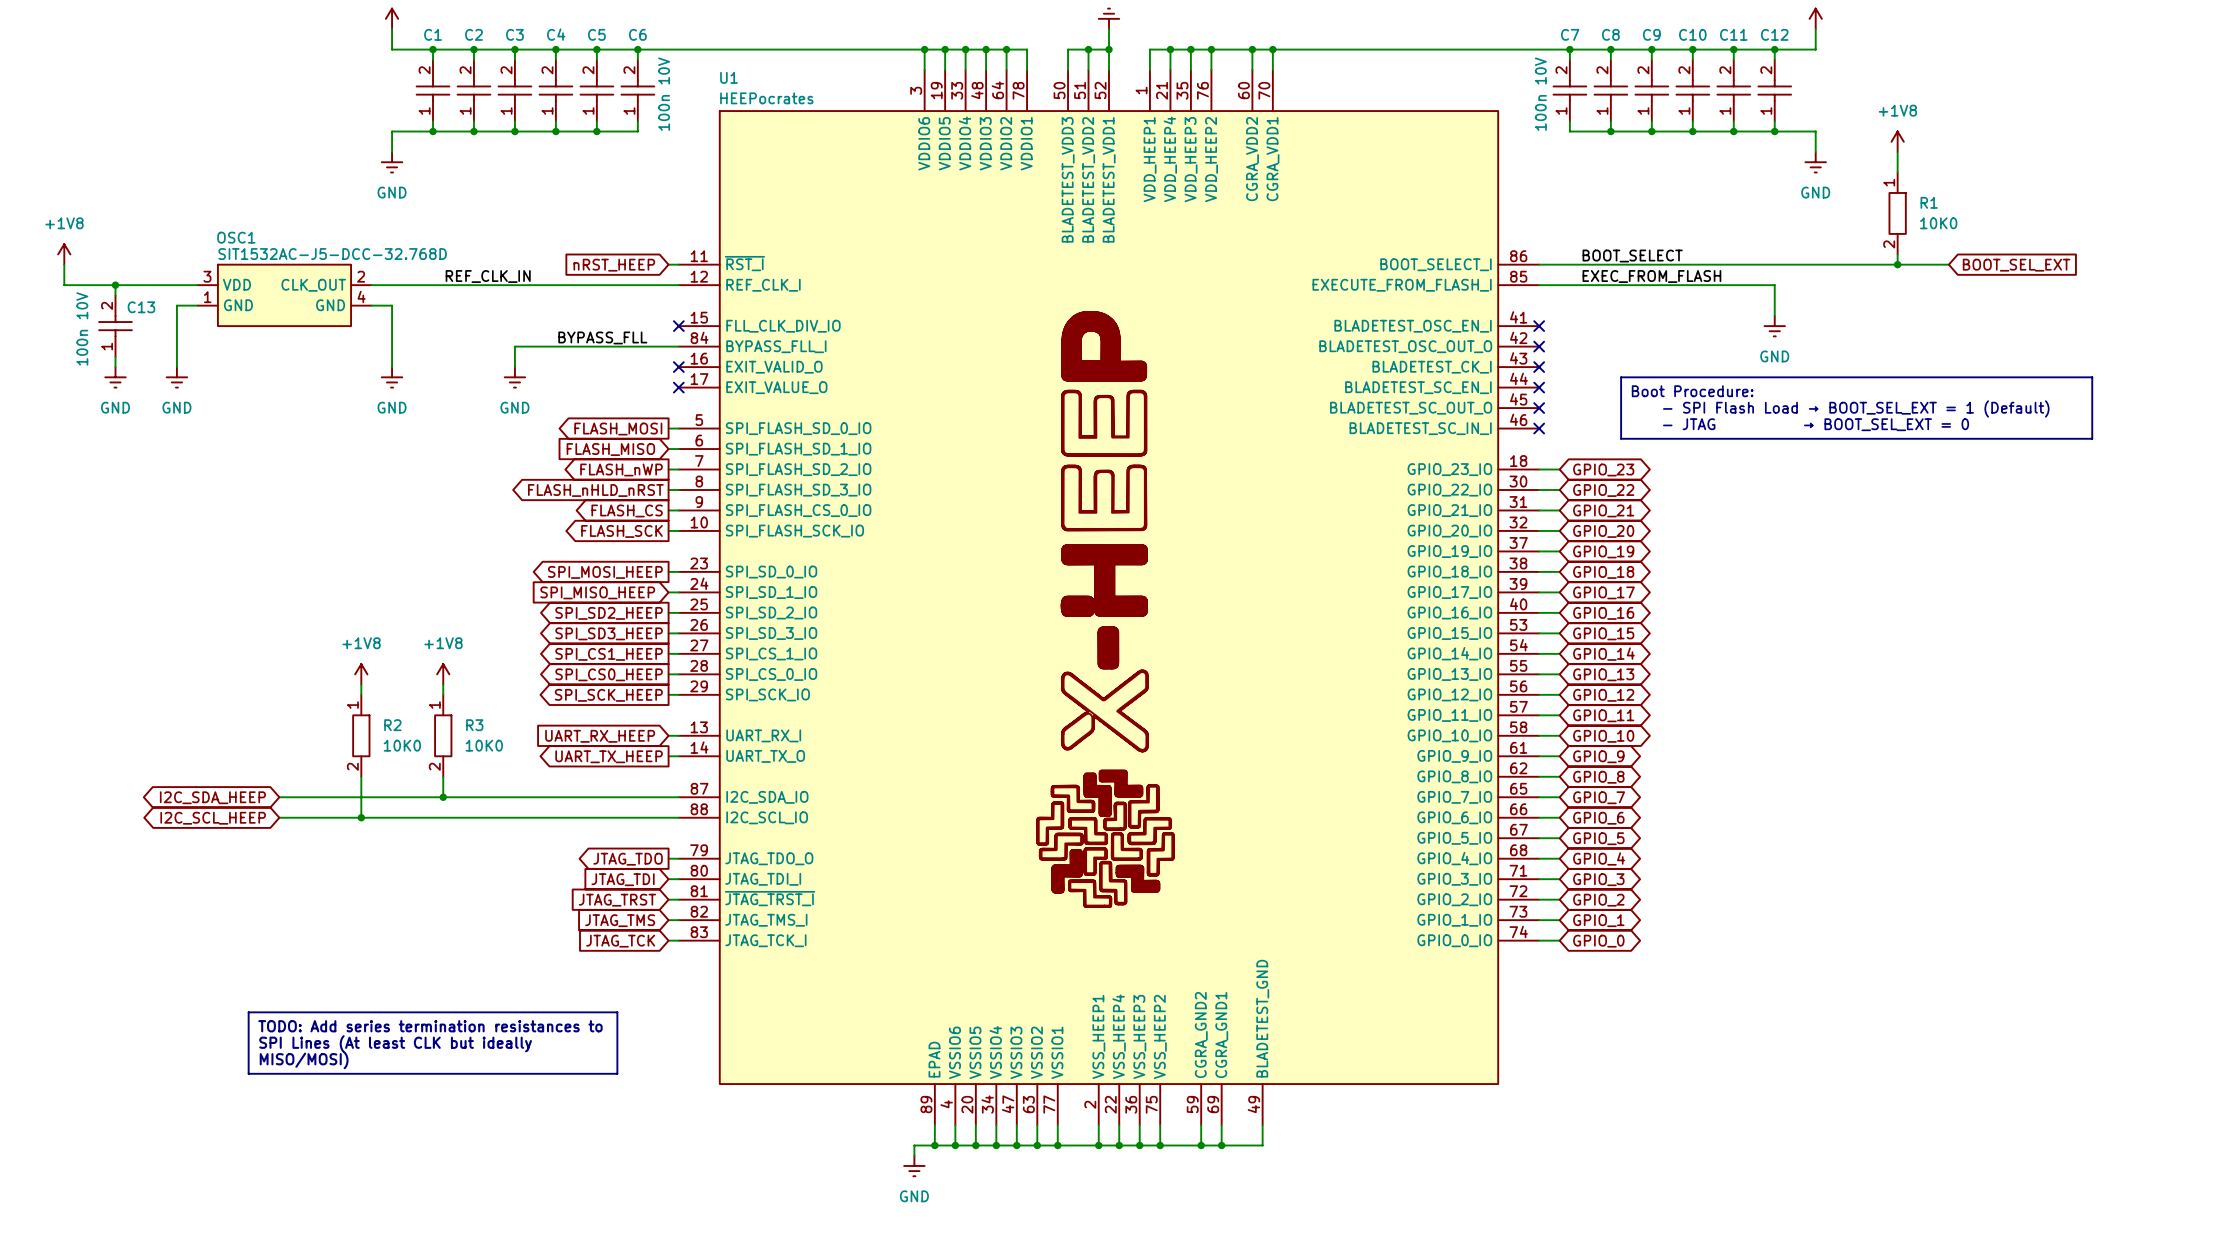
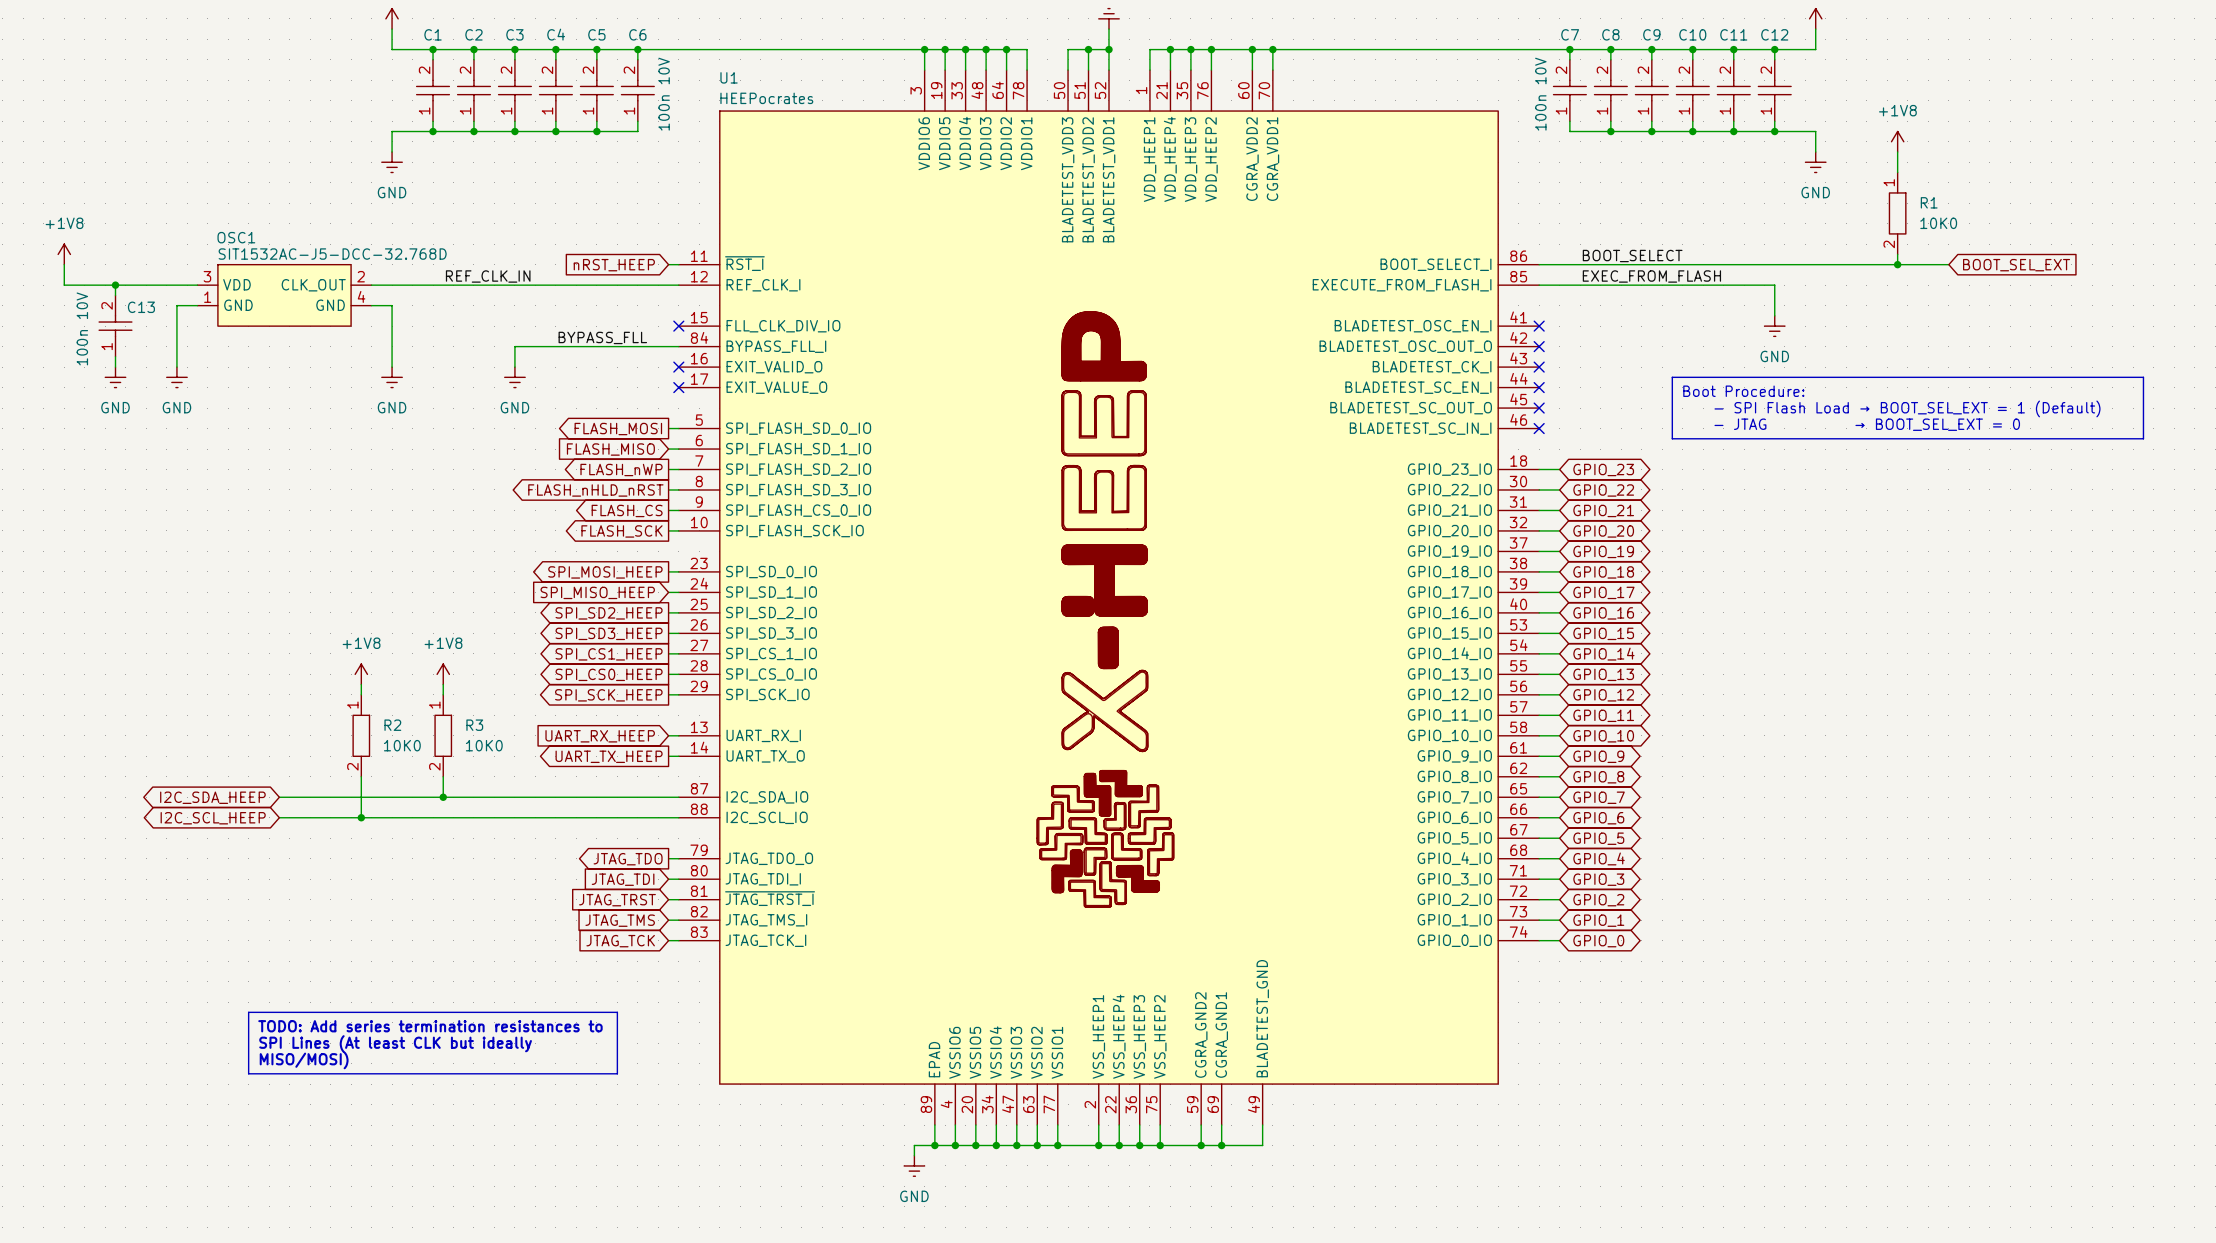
line: (1672, 377) (1621, 377) (1621, 438) (1672, 438) -> (1672, 377) (1672, 438)
line: (2092, 377) (2092, 438) -> (2092, 377) (2143, 377) (2143, 438) (2092, 438)
text position: Boot Procedure: (1692, 391) -> Boot Procedure: (1743, 391)
text position: - SPI Flash Load → BOOT_SEL_EXT = 1 (Default) (1856, 408) -> - SPI Flash Load → BOOT_SEL_EXT = 1 (Default) (1907, 408)
text position: - JTAG → BOOT_SEL_EXT = 0 (1816, 424) -> - JTAG → BOOT_SEL_EXT = 0 (1867, 424)

